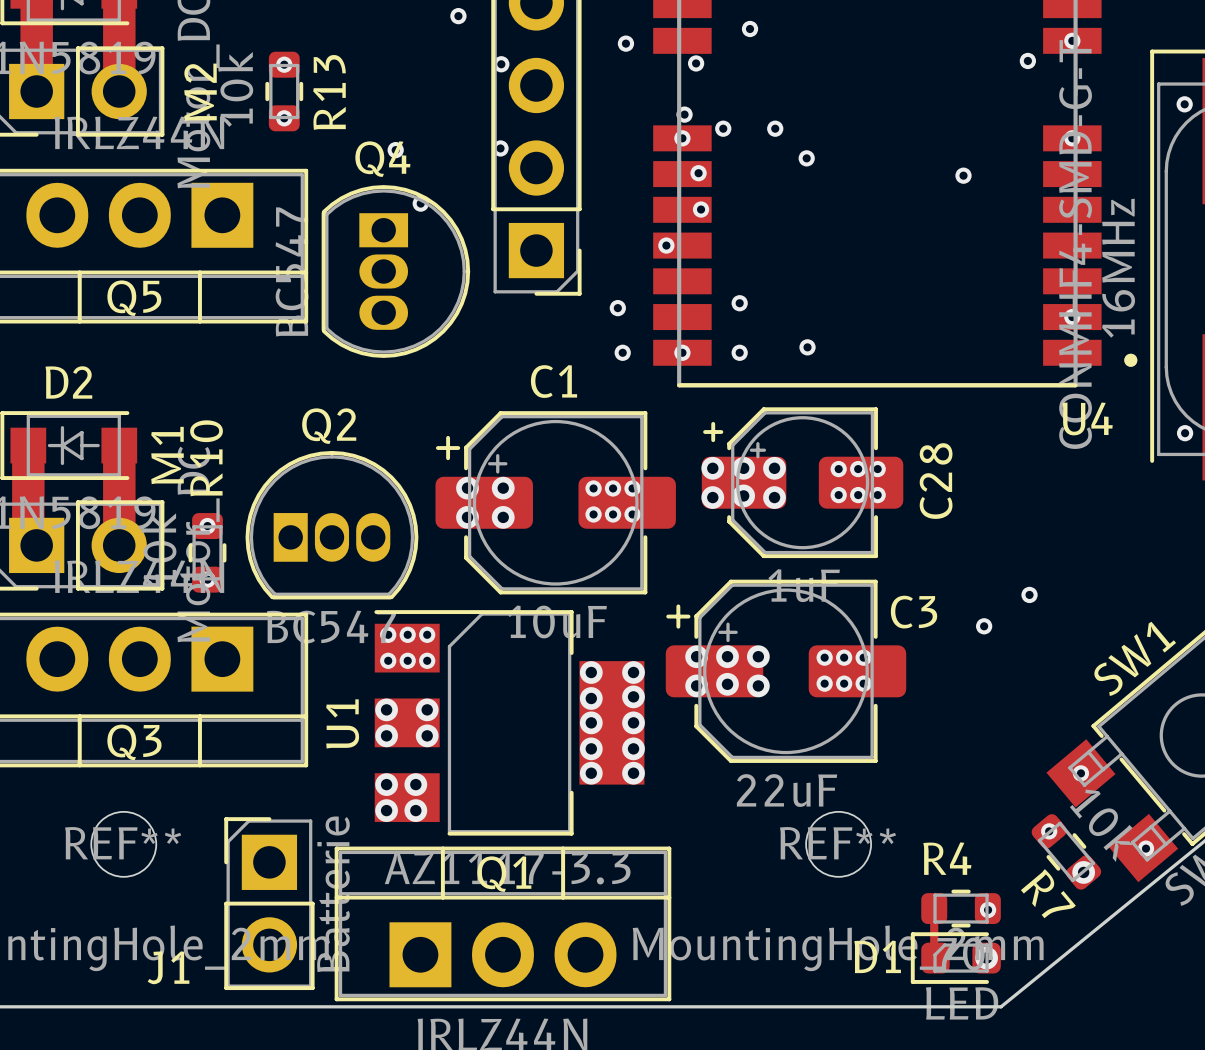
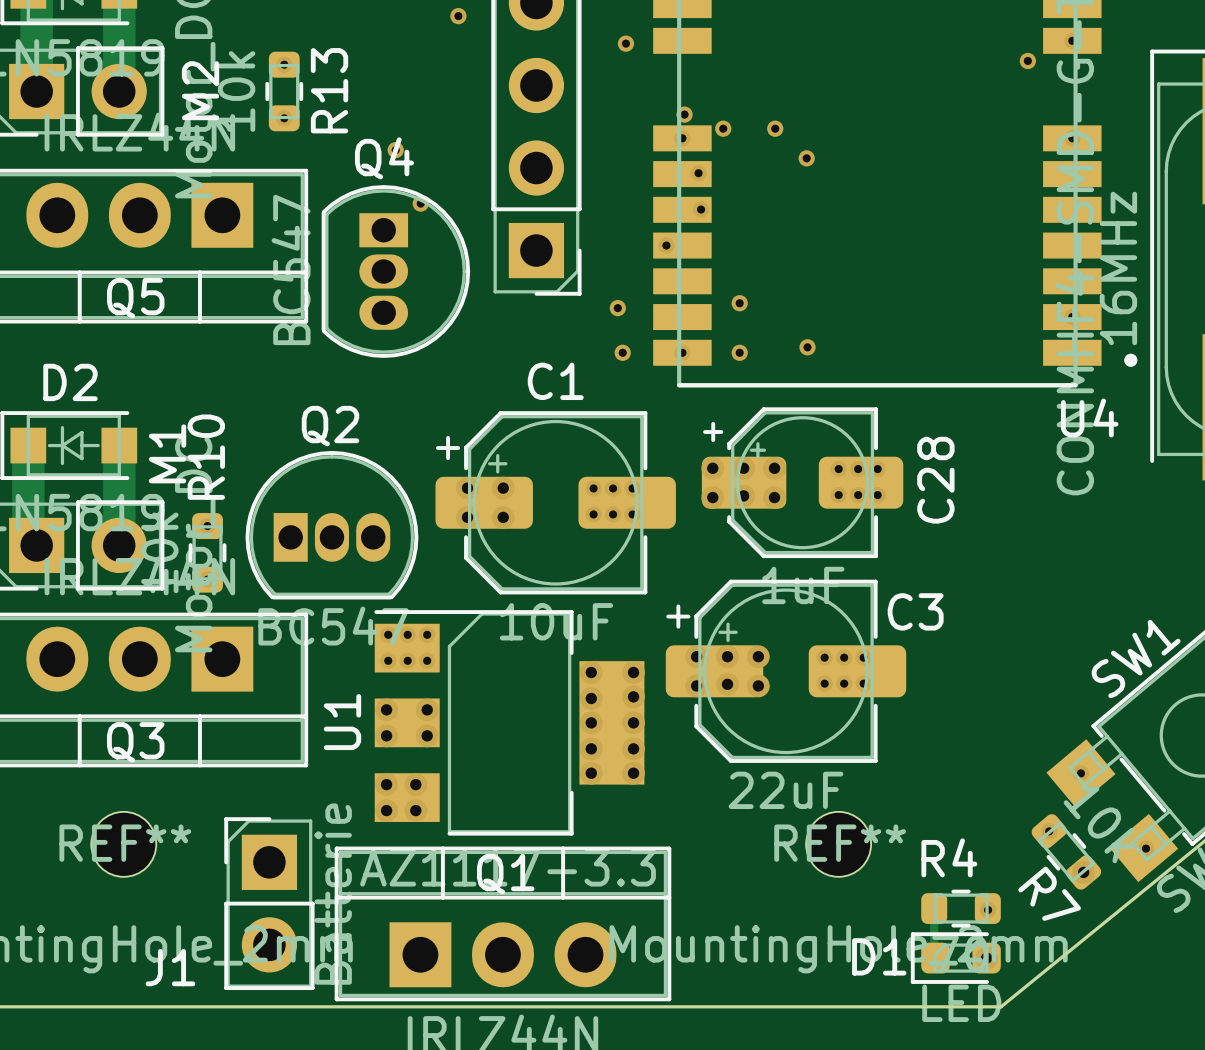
via: (750, 28) -> none
via: (696, 63) -> none
via: (501, 64) -> none
via: (1184, 104) -> none
via: (500, 148) -> none
via: (963, 175) -> none
via: (1185, 433) -> none
via: (1029, 594) -> none
via: (984, 626) -> none

